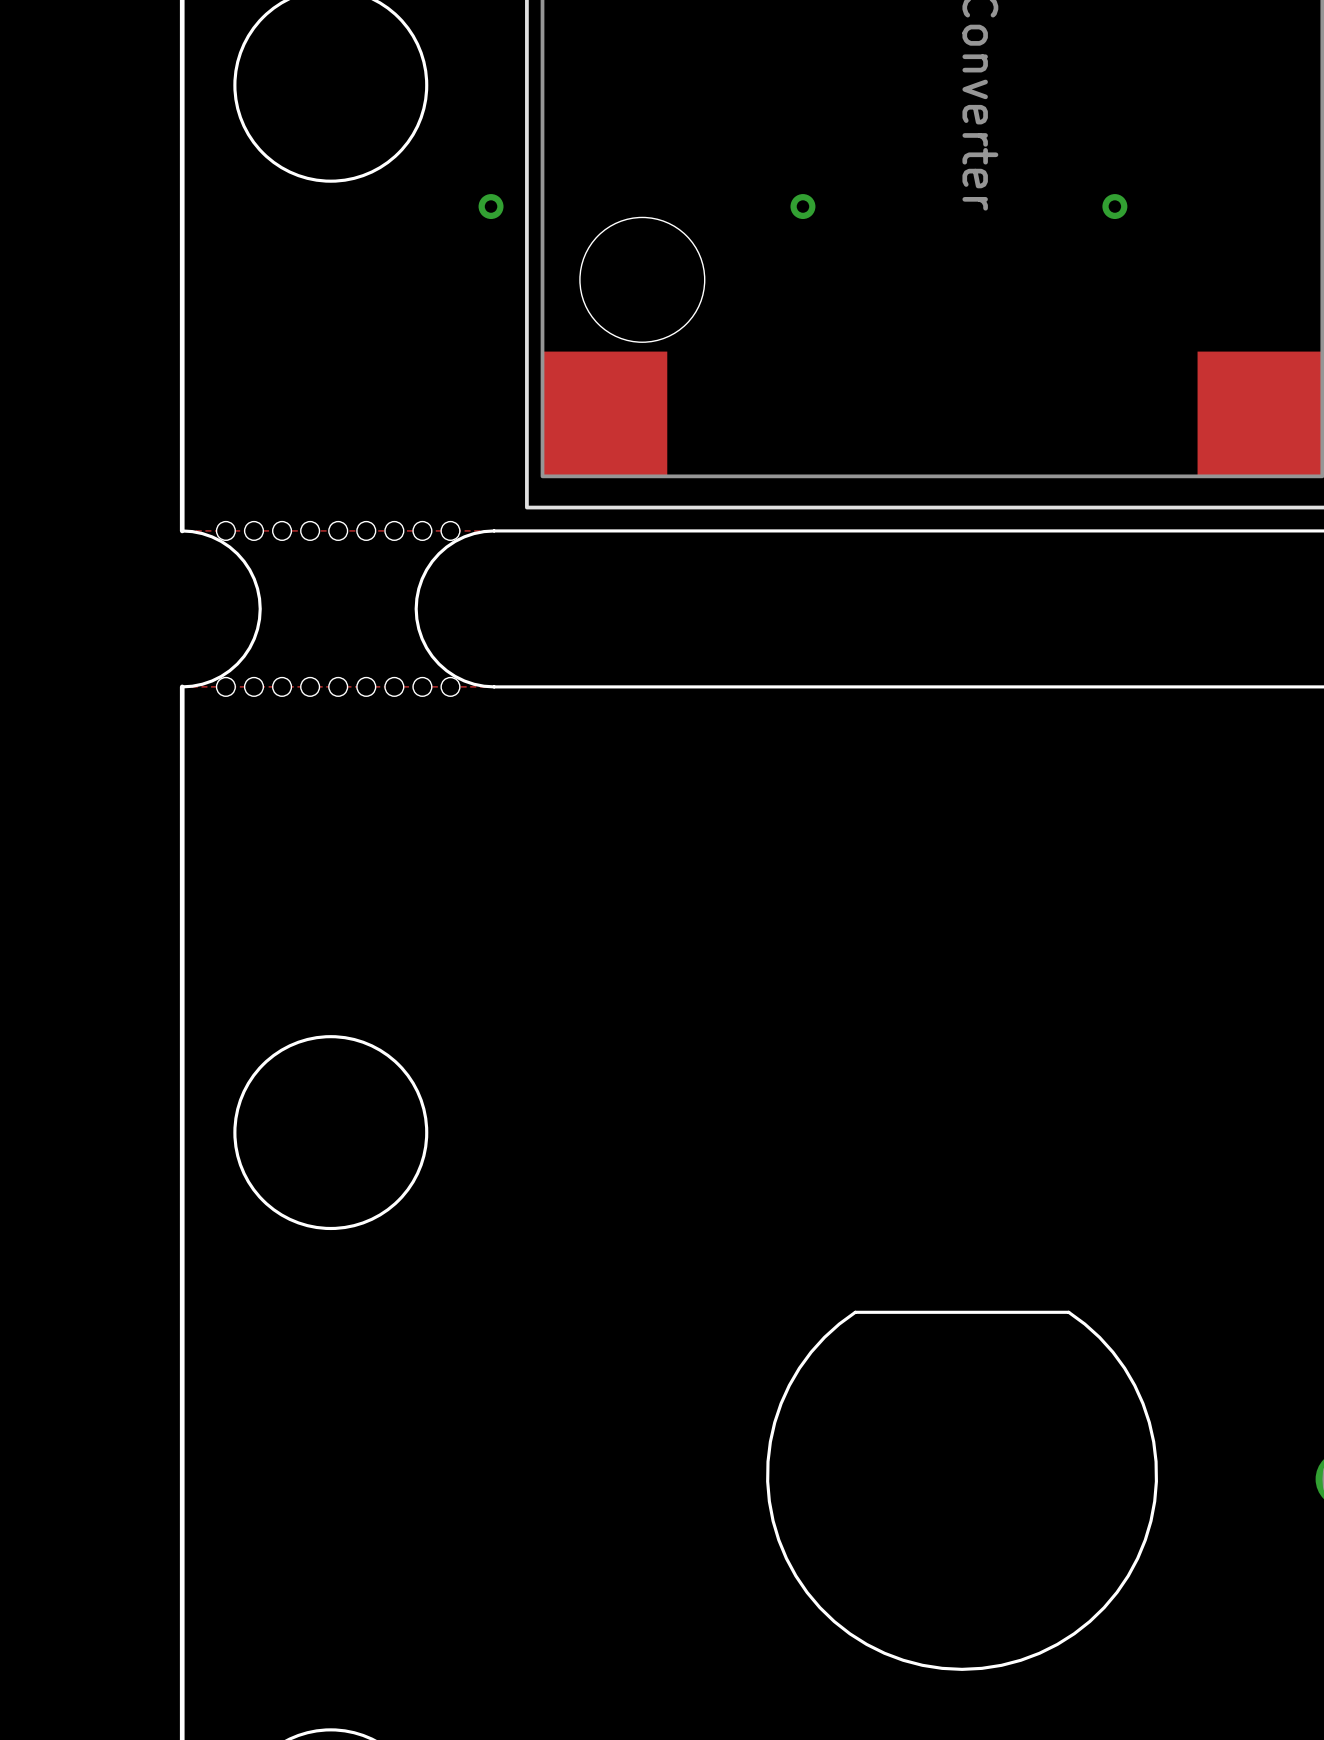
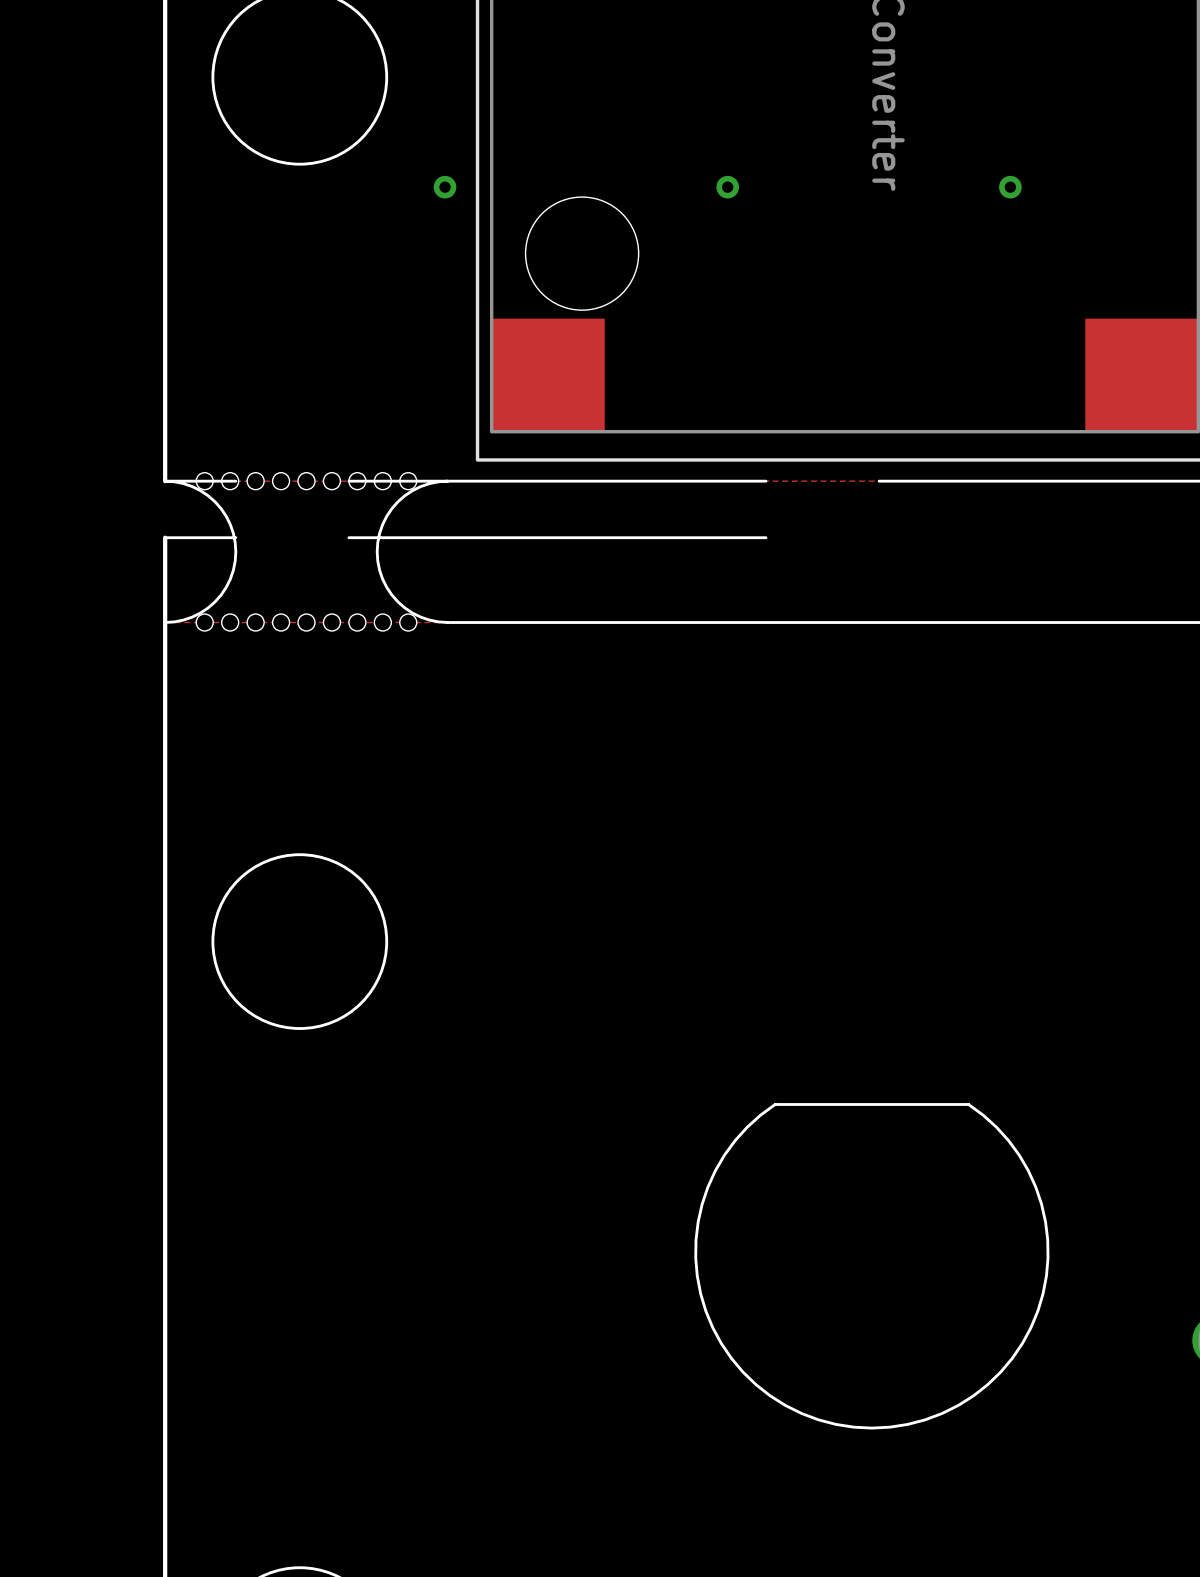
board edge: none -> (165, 481) (235, 481)
board edge: none -> (348, 481) (447, 481)
board edge: (845, 530) (970, 530) -> none
board edge: none -> (235, 537) (165, 537) (165, 622)
board edge: none -> (348, 537) (766, 537)
round board edge position: (330, 1132) -> (299, 941)
board edge: (855, 1312) (1068, 1312) (1099, 1337) (1124, 1368) (1142, 1403) (1153, 1441) (1156, 1481) (1150, 1520) (1145, 1540) (1128, 1575) (1104, 1607) (1074, 1633) (1039, 1653) (1001, 1665) (962, 1669) (922, 1665) (884, 1653) (849, 1633) (819, 1607) (795, 1575) (778, 1540) (773, 1520) (767, 1481) (770, 1441) (781, 1403) (799, 1368) (824, 1337) (855, 1312) -> (775, 1104) (968, 1104) (996, 1127) (1019, 1155) (1035, 1187) (1045, 1221) (1048, 1257) (1043, 1293) (1031, 1327) (1012, 1358) (1000, 1372) (973, 1395) (942, 1413) (907, 1424) (871, 1428) (836, 1424) (801, 1413) (770, 1395) (756, 1384) (731, 1358) (712, 1327) (700, 1293) (695, 1257) (698, 1221) (707, 1187) (724, 1155) (747, 1127) (775, 1104)

